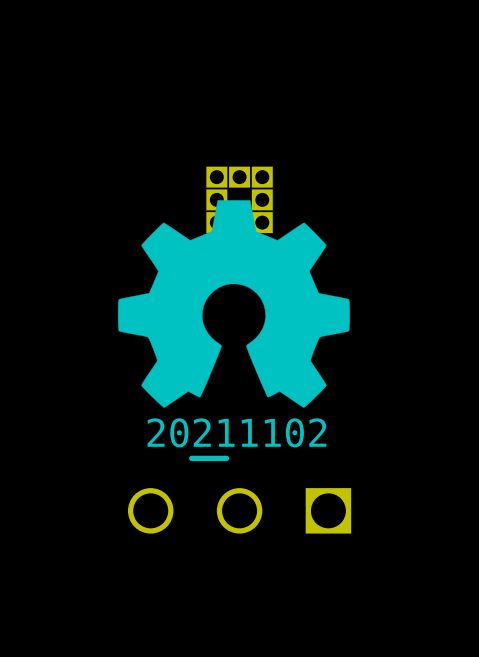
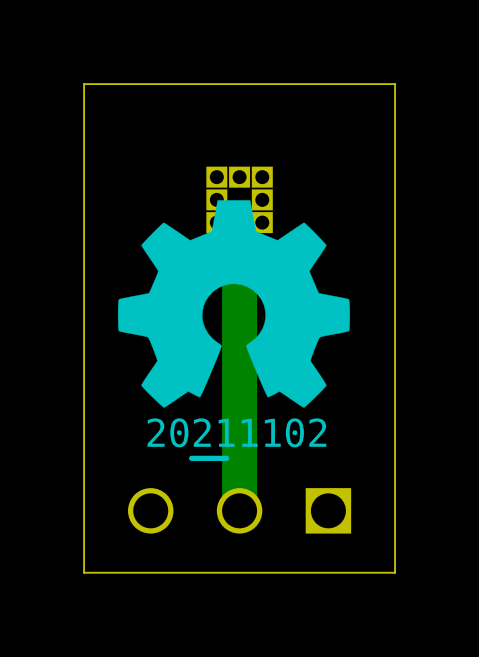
board edge: none -> (395, 84) (395, 572) (84, 572) (84, 84) (395, 84)
track: none -> (239, 288) (239, 506)

